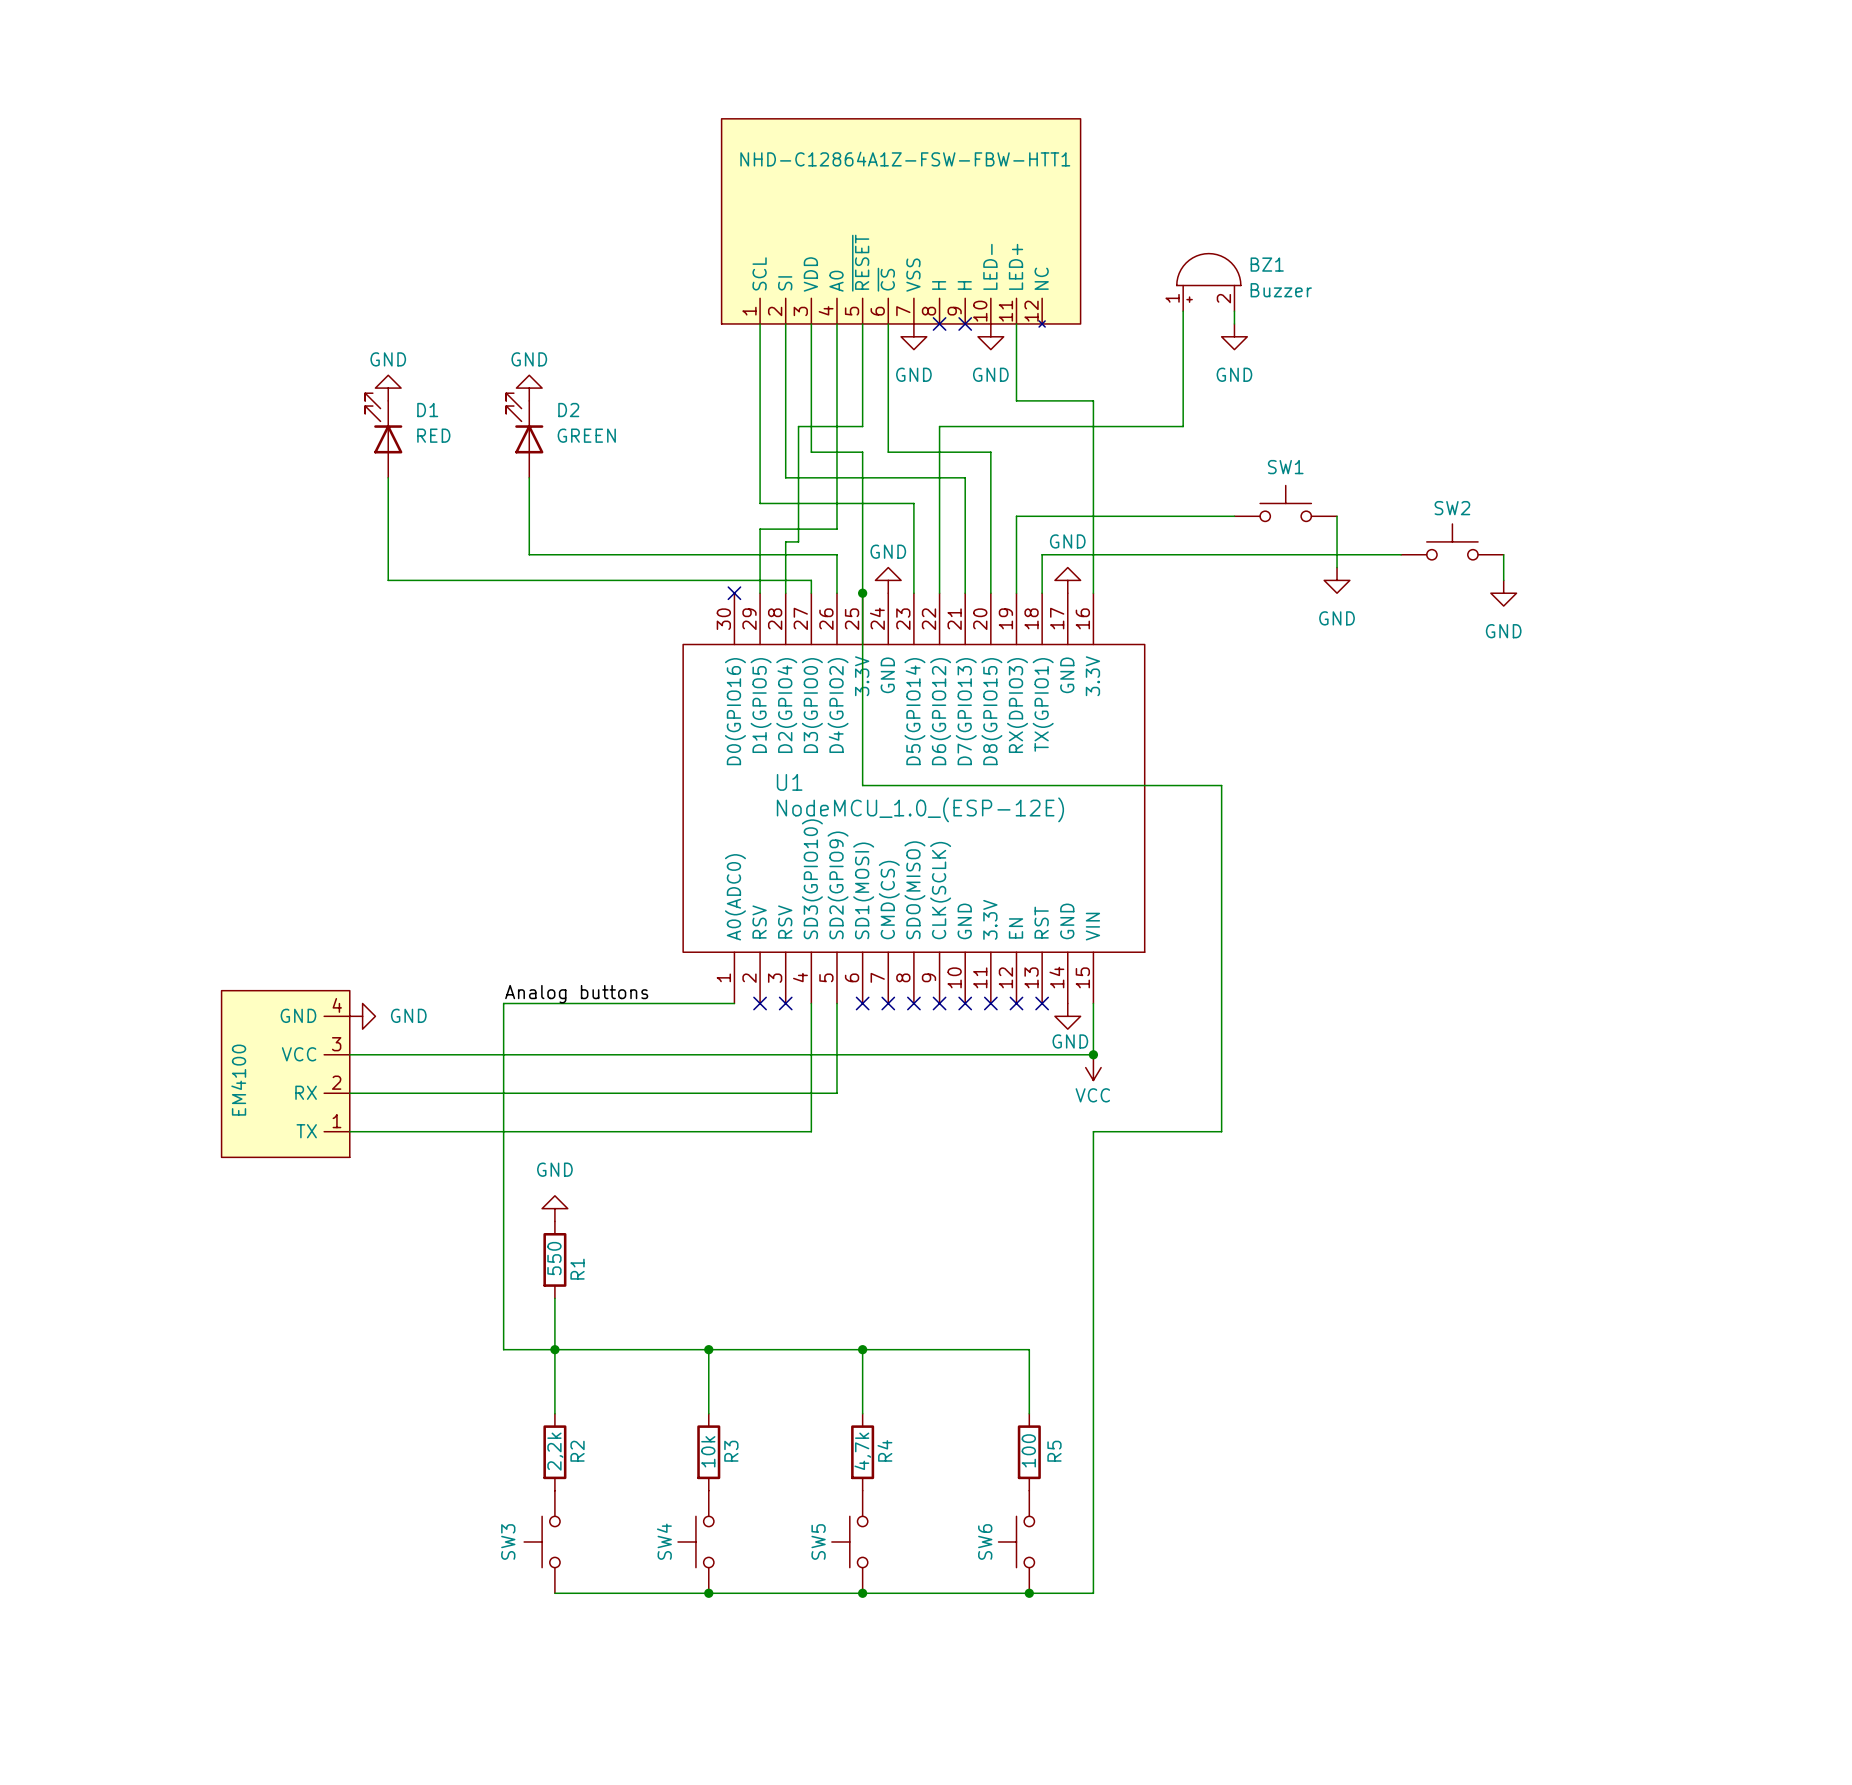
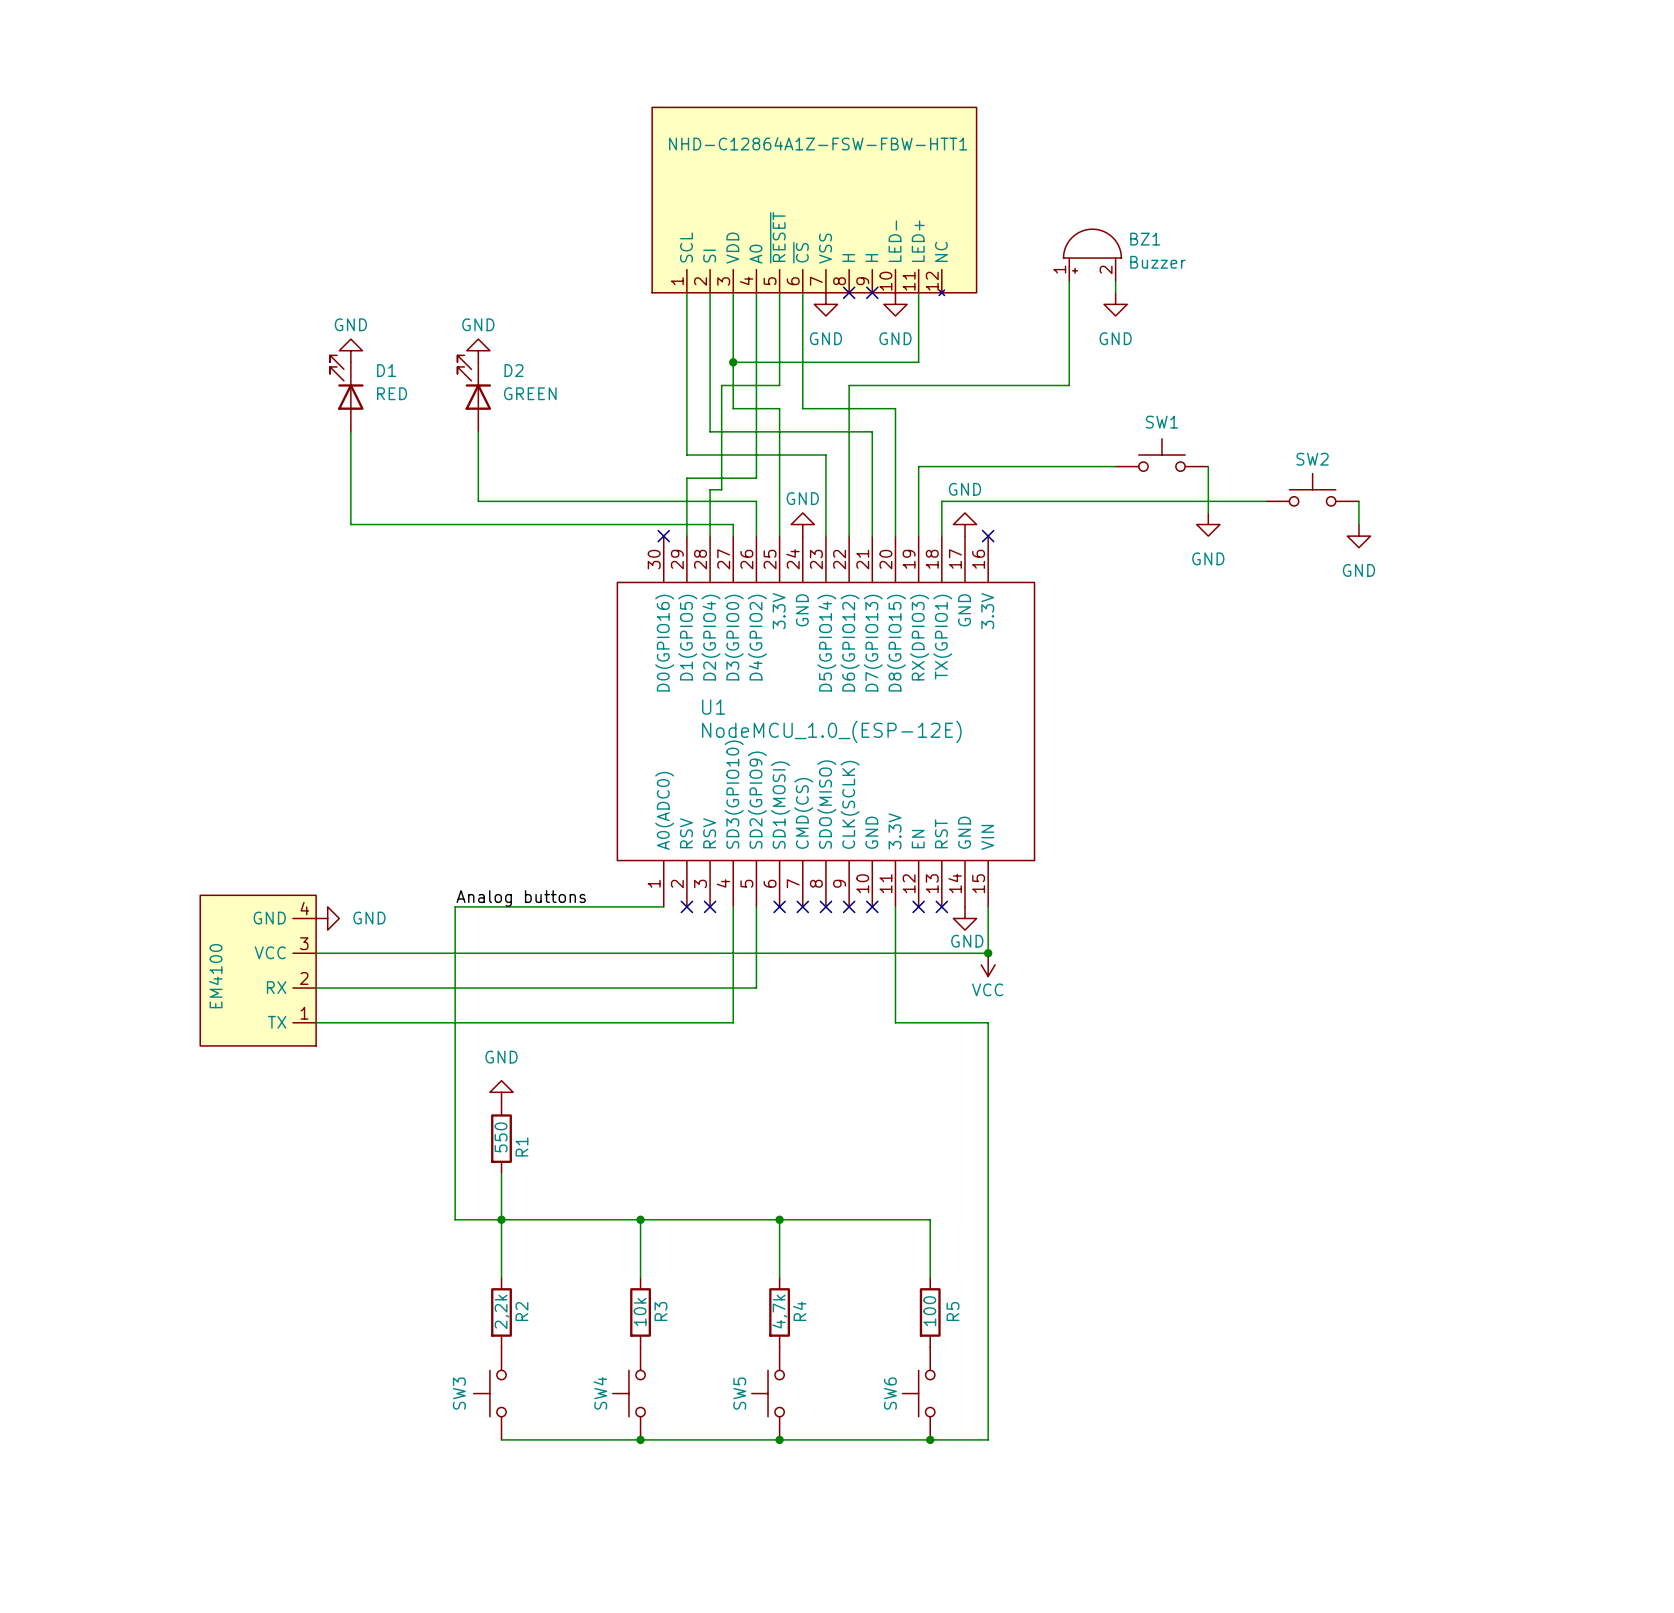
junction: none -> (733, 362)
wire: (1016, 400) (1093, 400) (1093, 593) -> (918, 362) (733, 362)
wire: (862, 593) (862, 785) (1221, 785) (1221, 1131) (1093, 1131) -> (895, 906) (895, 1022) (988, 1022)
junction: (862, 593) -> none
no-connect mark: none -> (988, 536)
no-connect mark: (990, 1003) -> none

